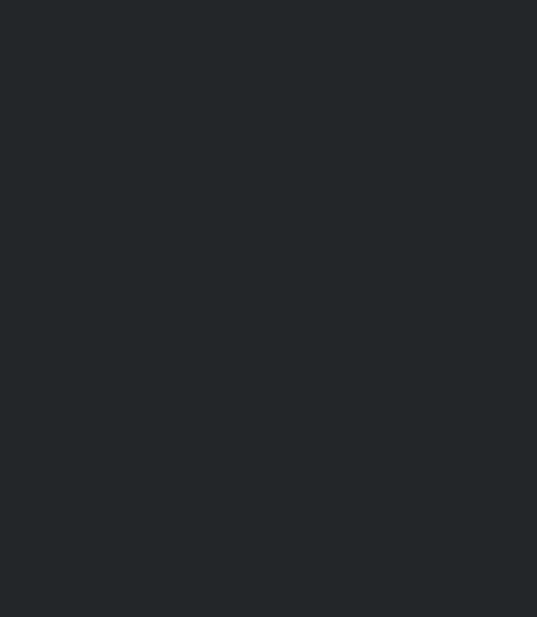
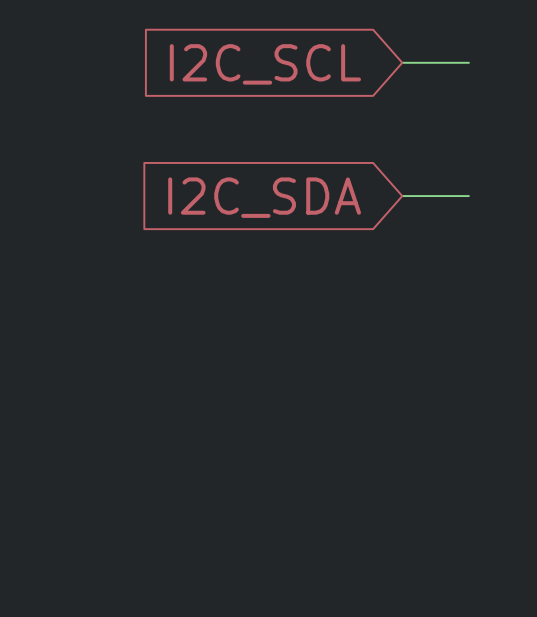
wire: none -> (402, 62) (468, 62)
global label: none -> I2C_SCL (265, 64)
wire: none -> (402, 196) (468, 196)
global label: none -> I2C_SDA (264, 197)

